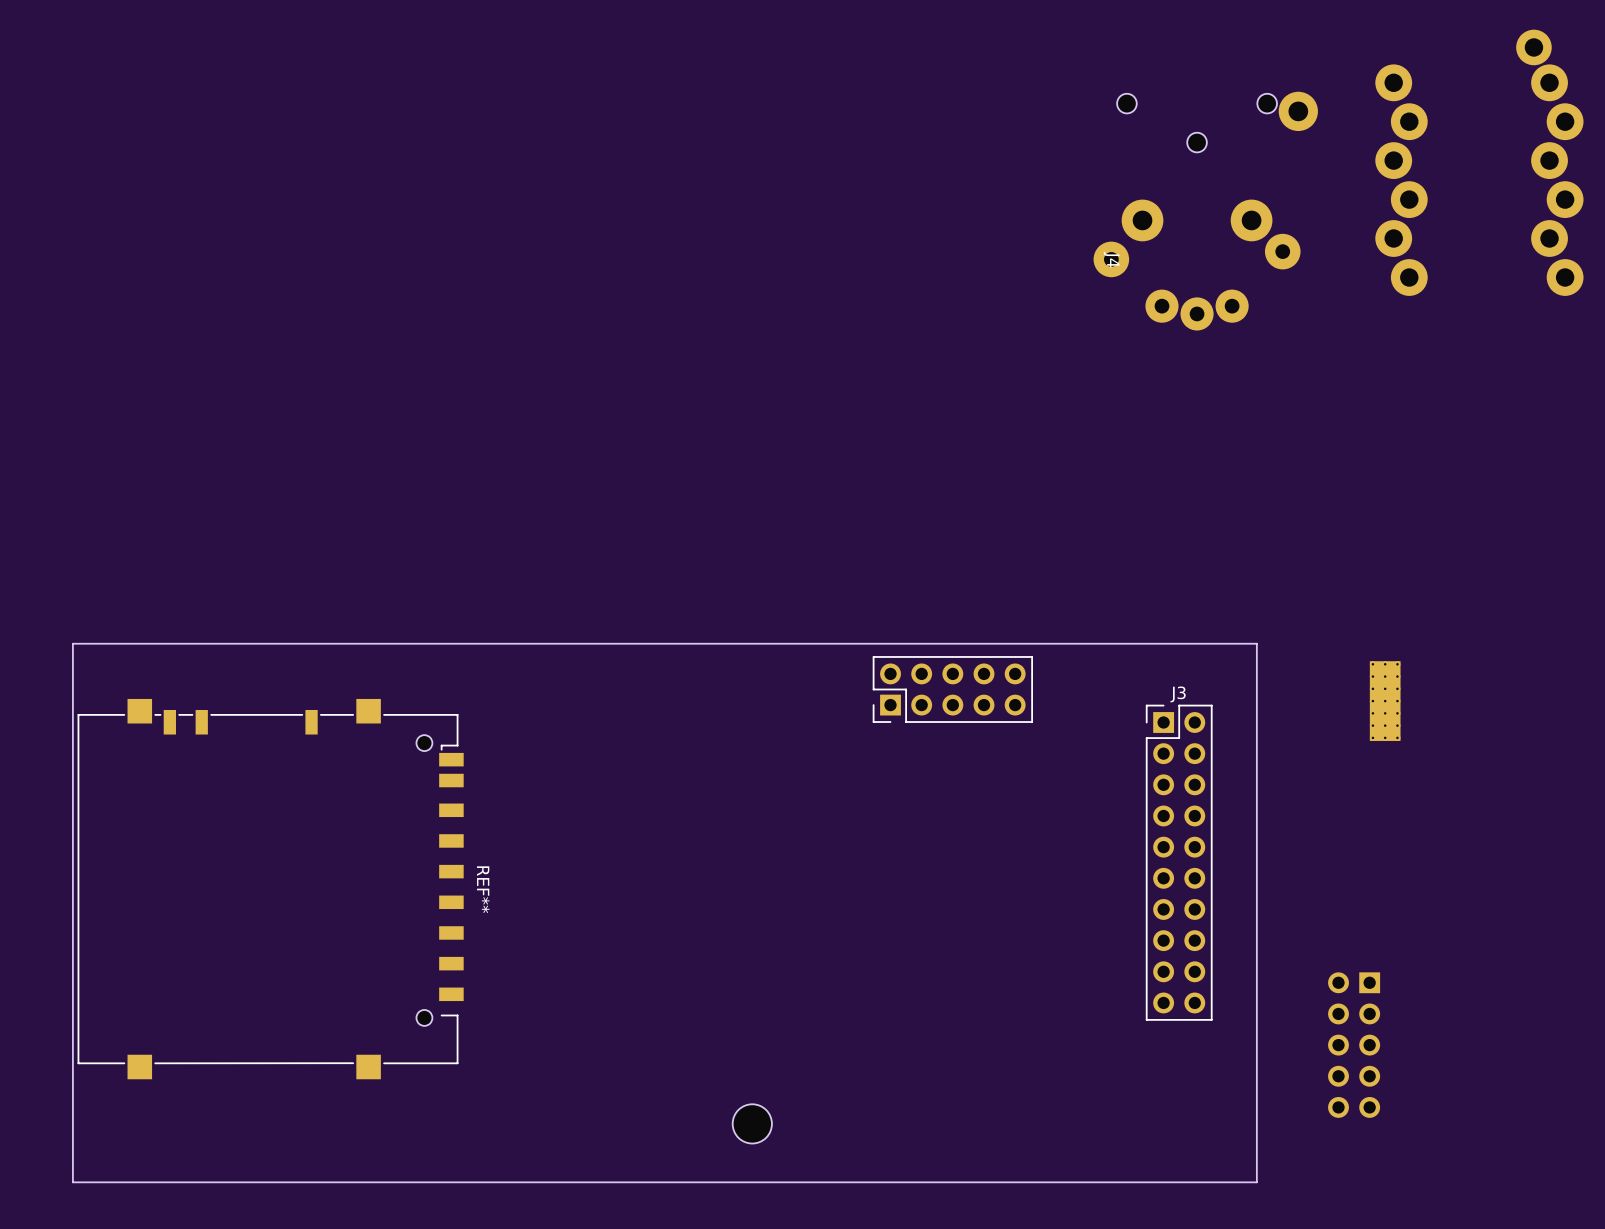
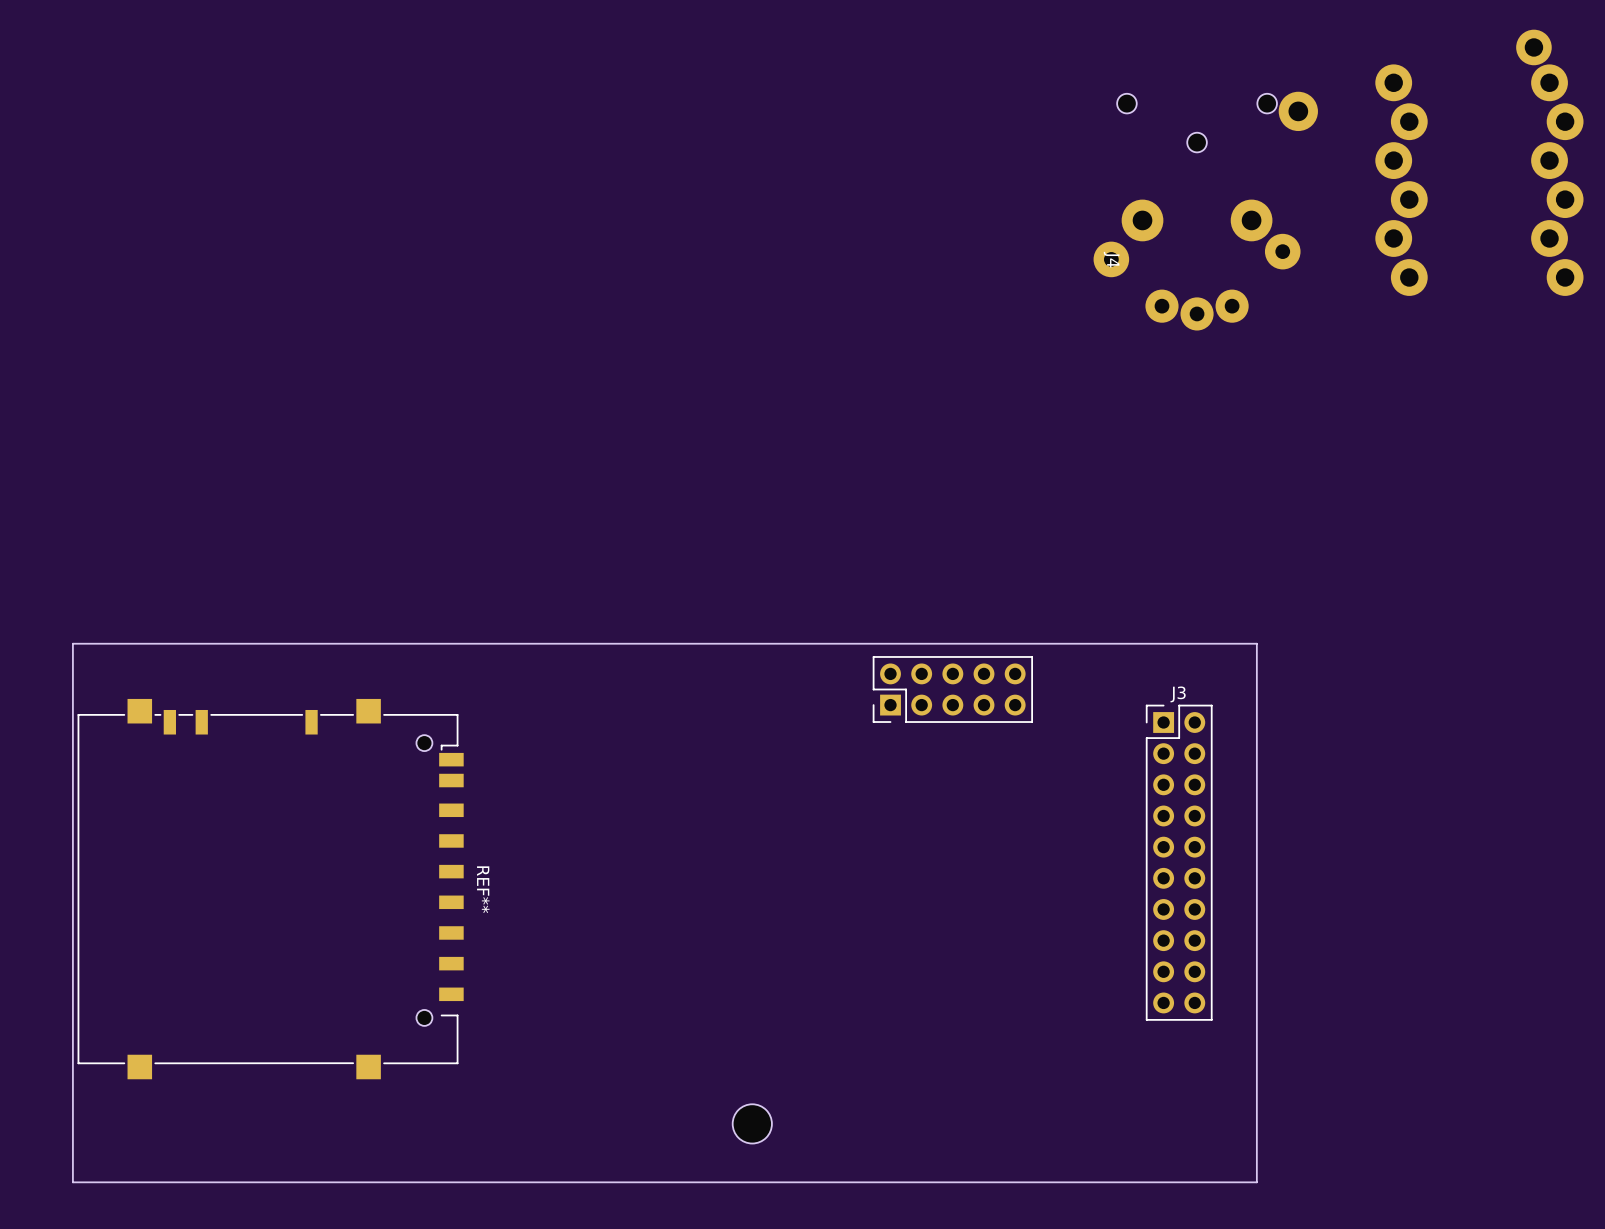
part: (1385, 701) -> none
part: (1354, 1045) -> none

